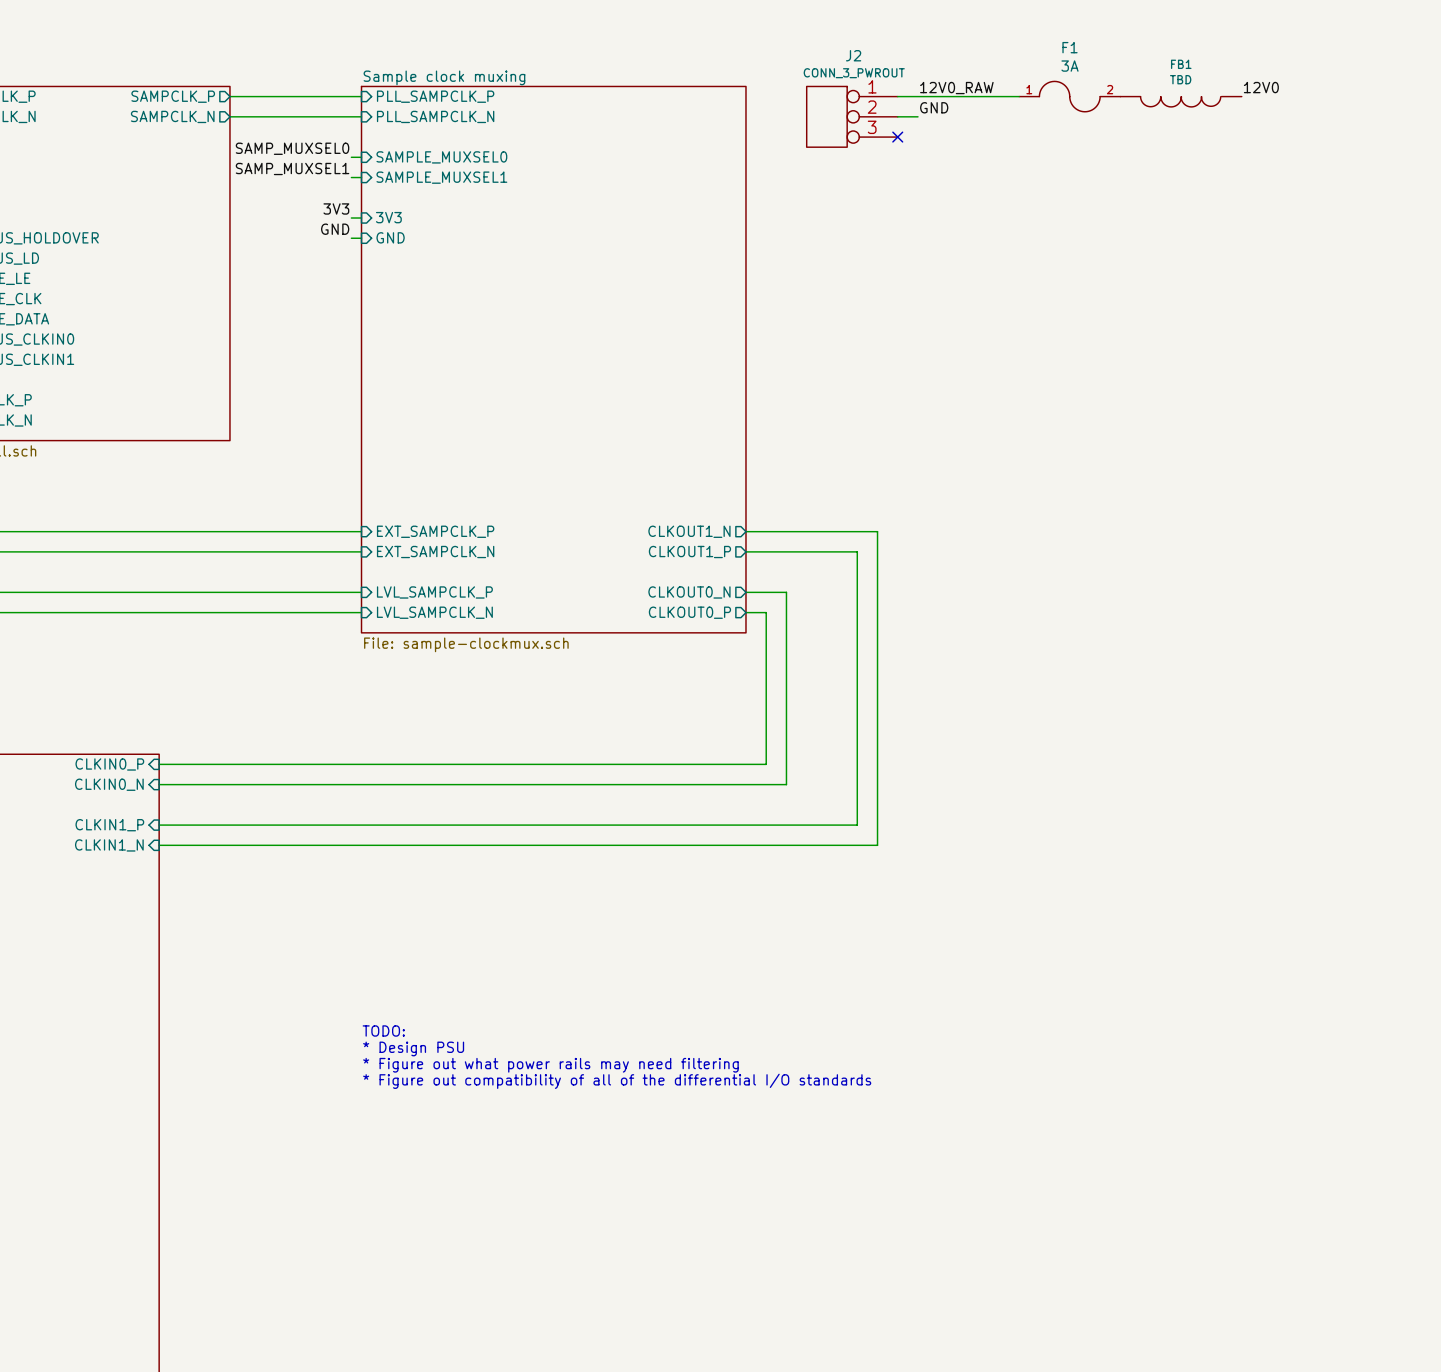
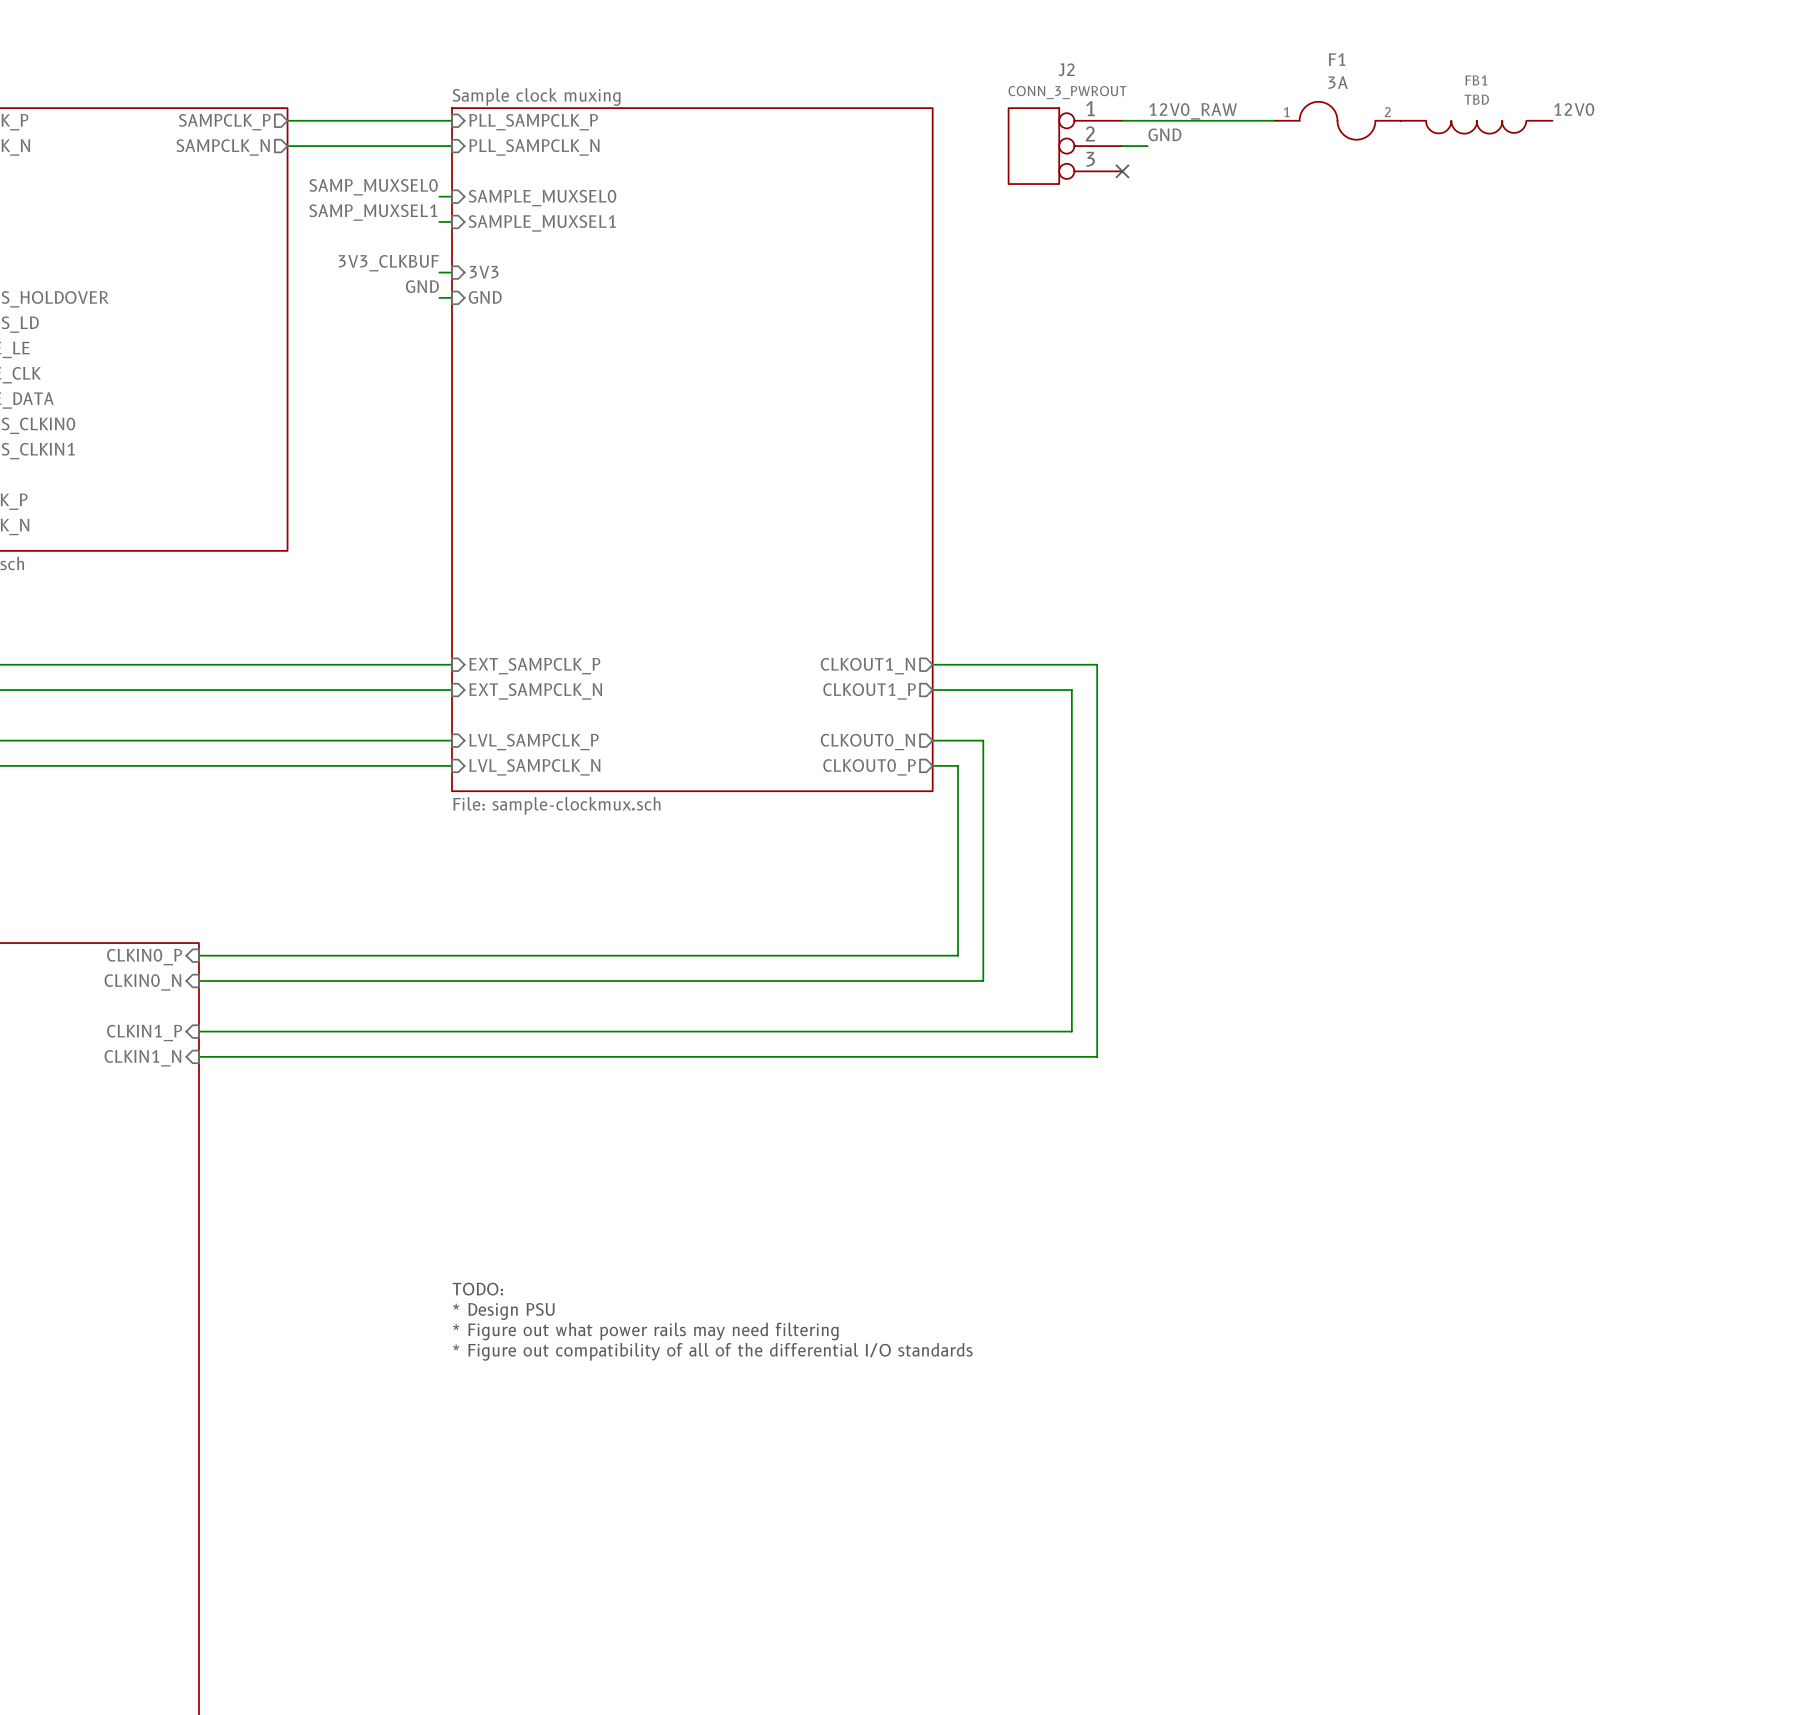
label: 3V3 (336, 208) -> 3V3_CLKBUF (388, 263)

